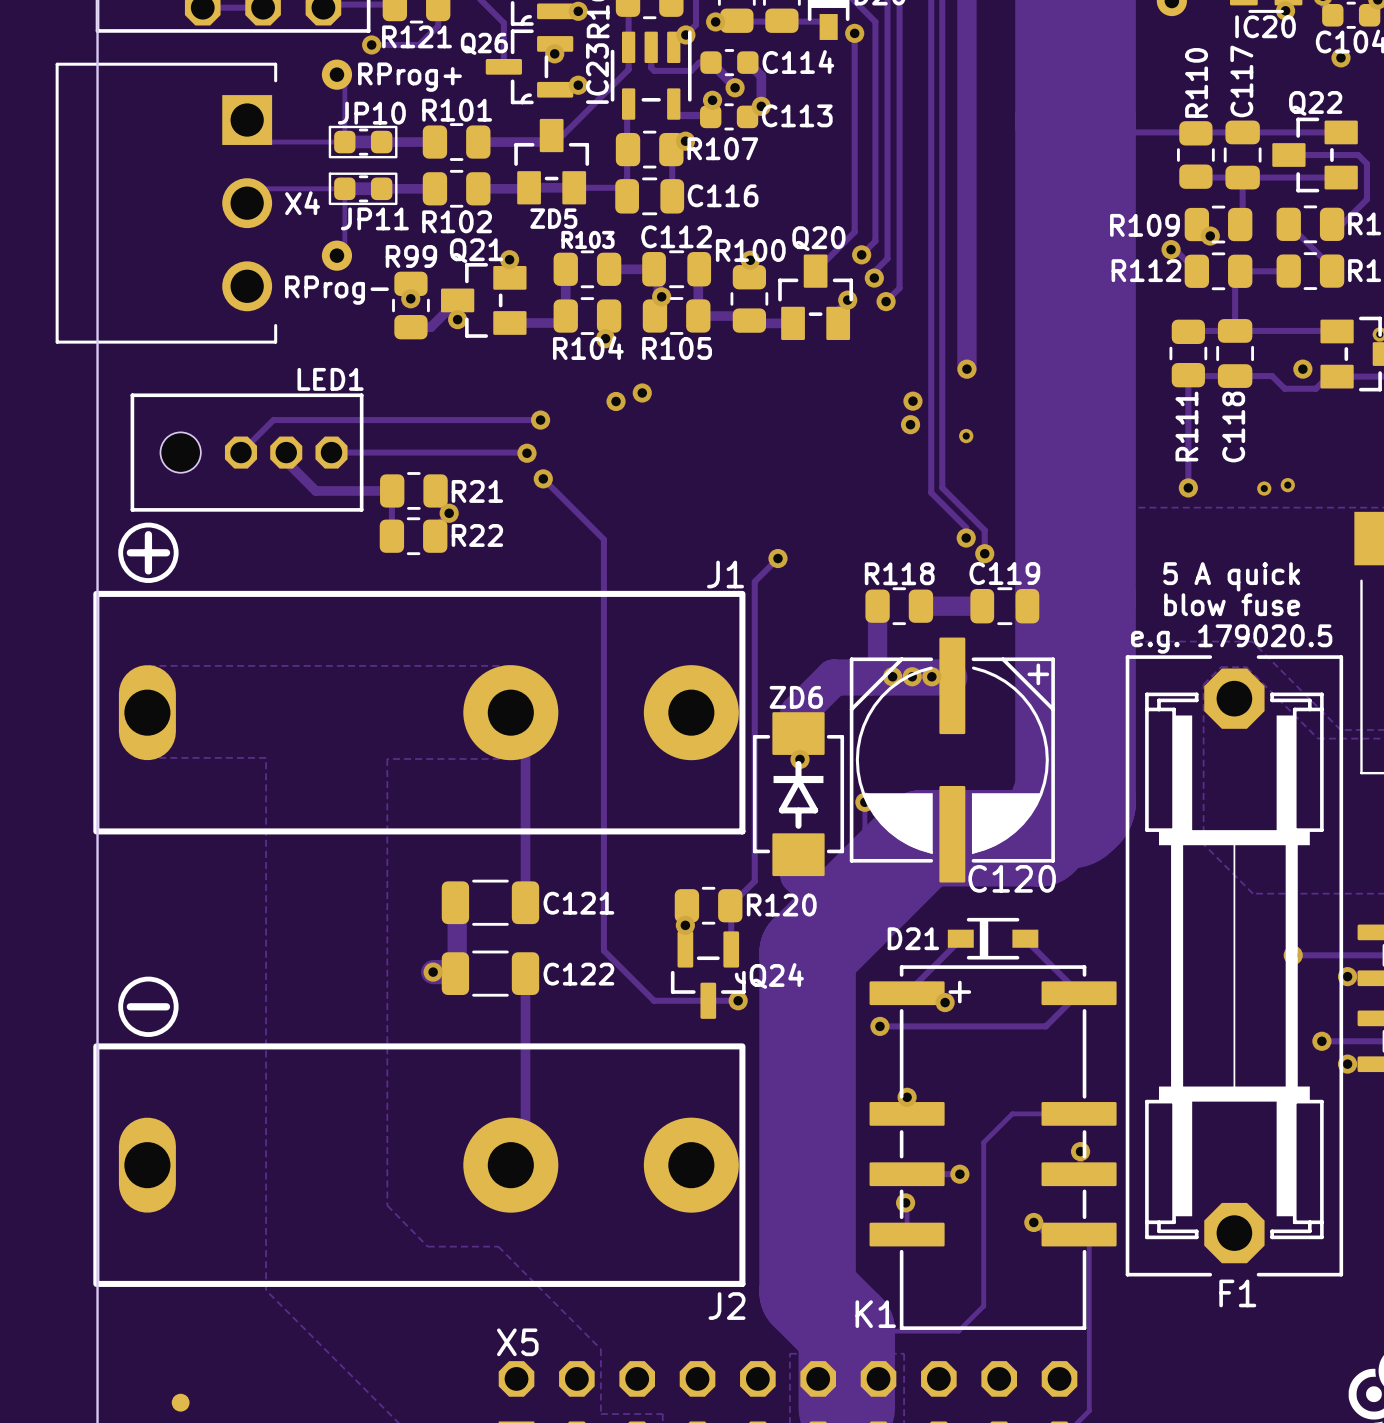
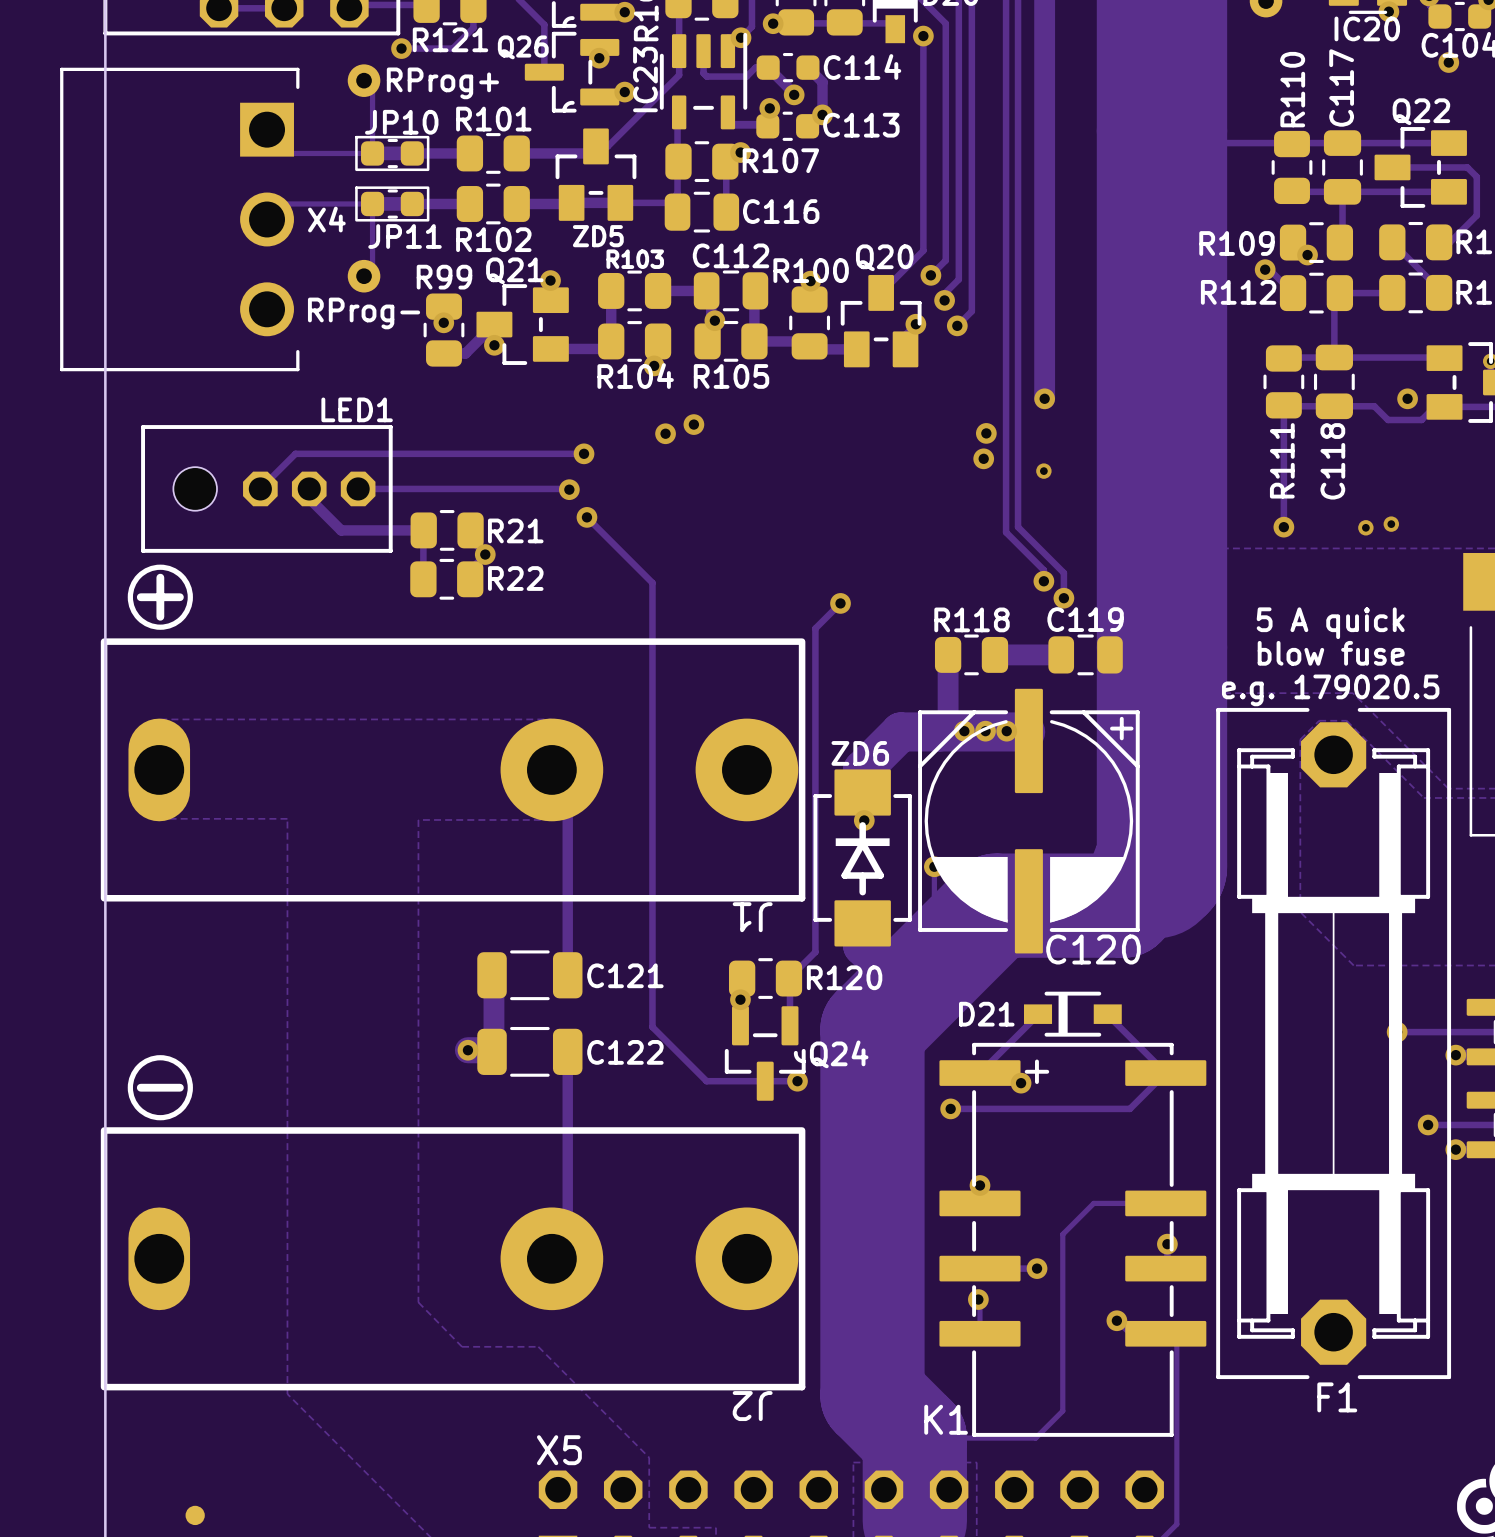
J1 name rotation: 0° (725, 574) -> 180° (752, 917)
J1 name position: J1 (725, 574) -> J1 (752, 917)
J2 name rotation: 0° (727, 1306) -> 180° (752, 1406)

